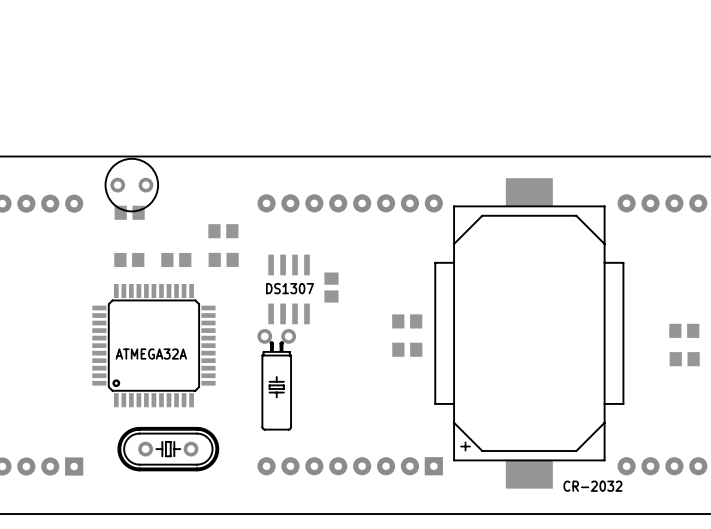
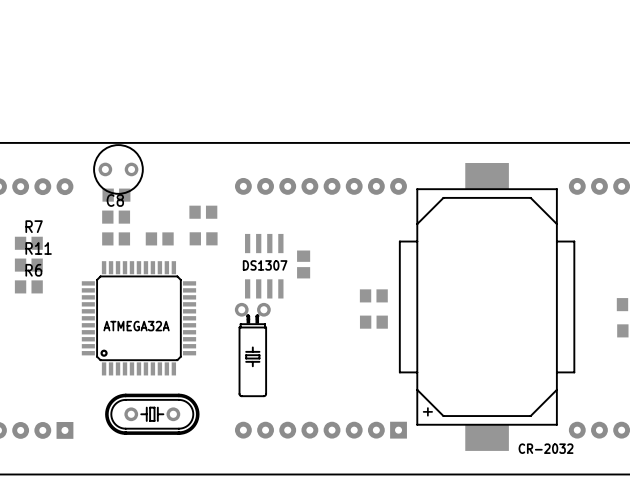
C8: none -> (116, 217)
R7: none -> (28, 243)
R11: none -> (28, 265)
R6: none -> (28, 286)

